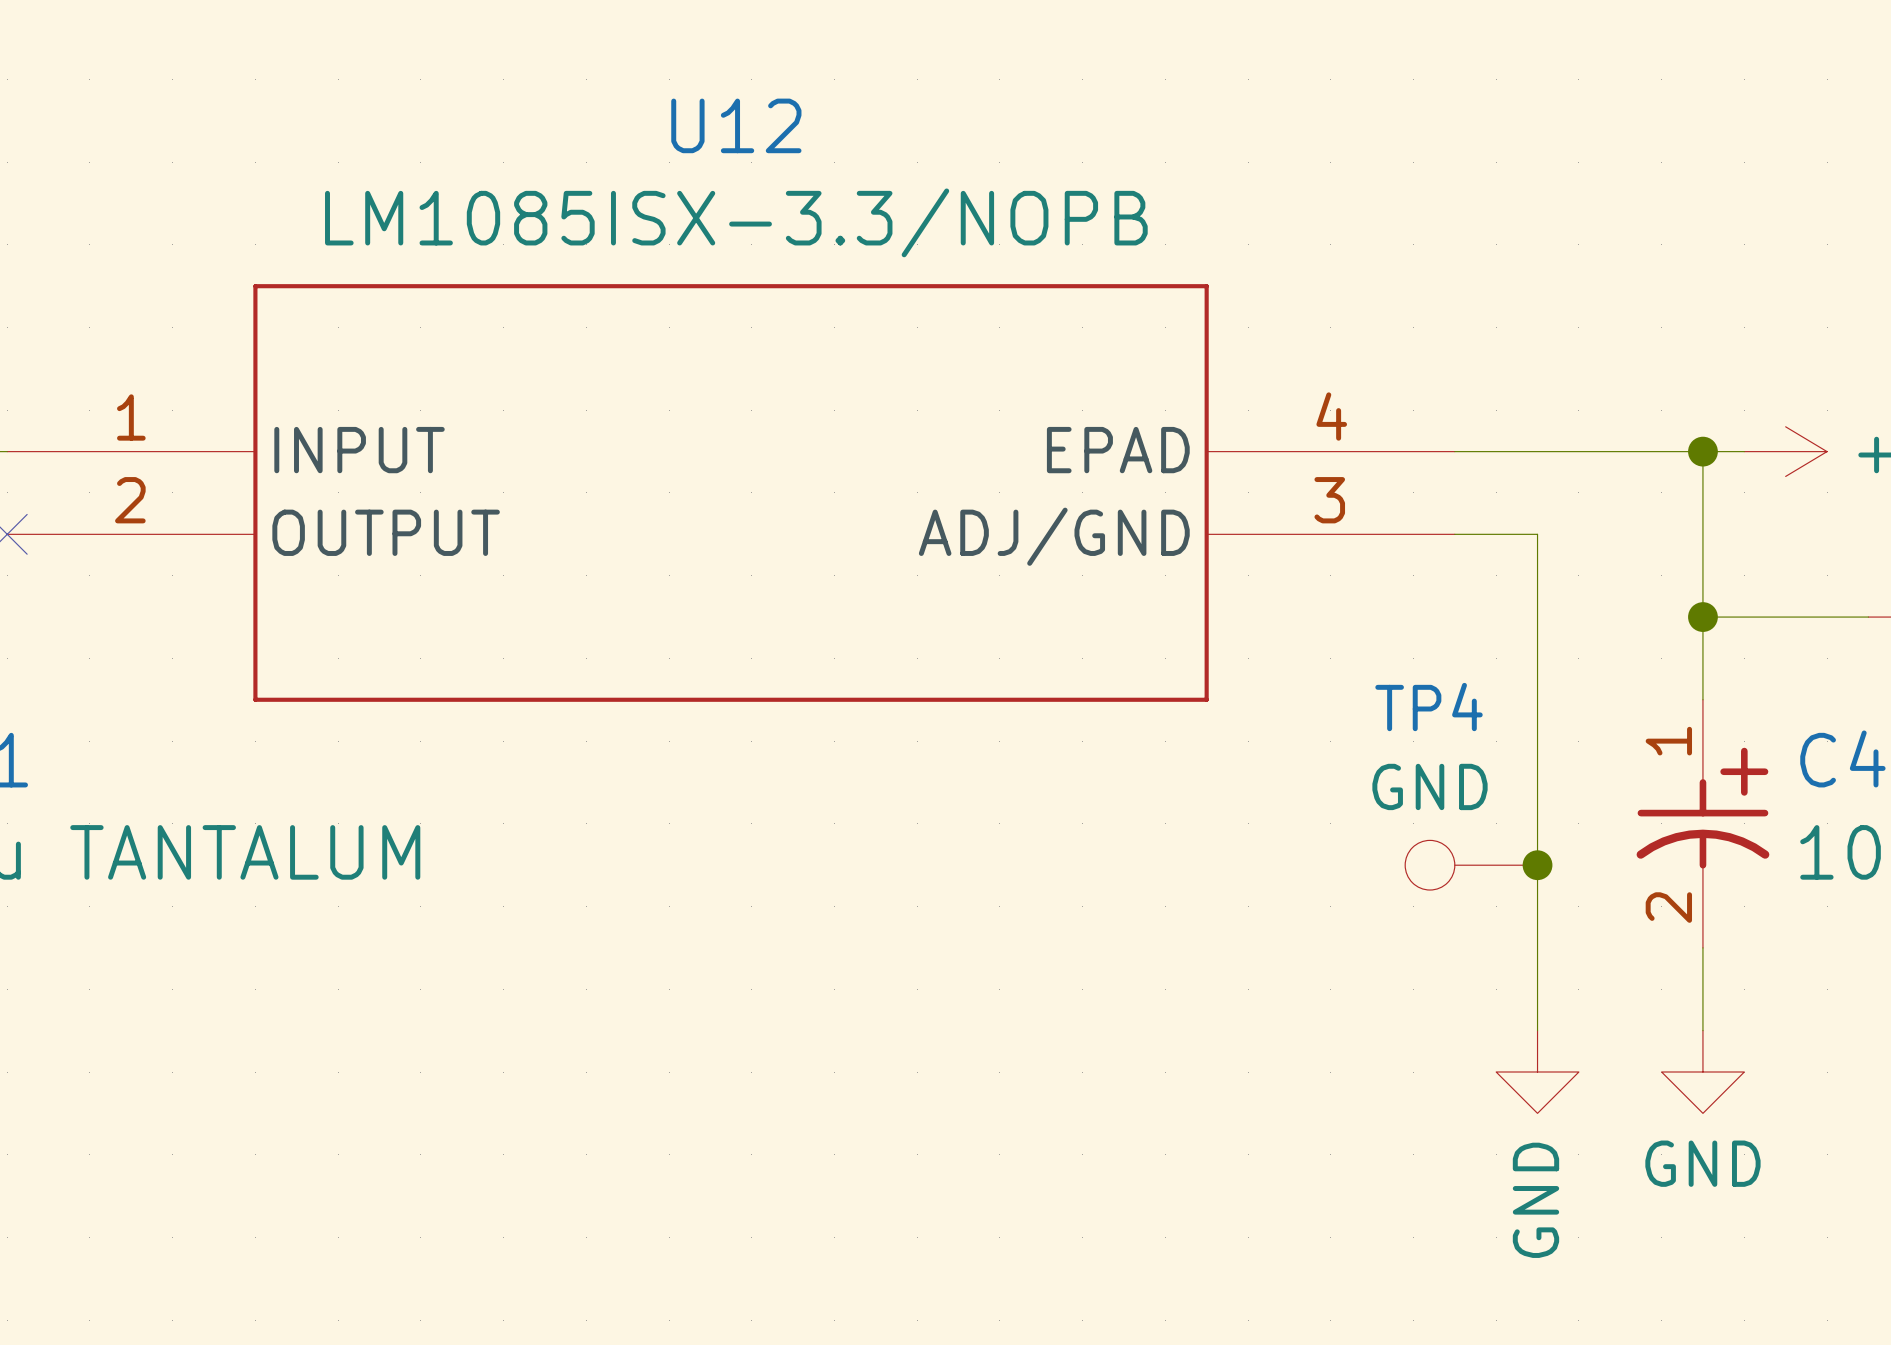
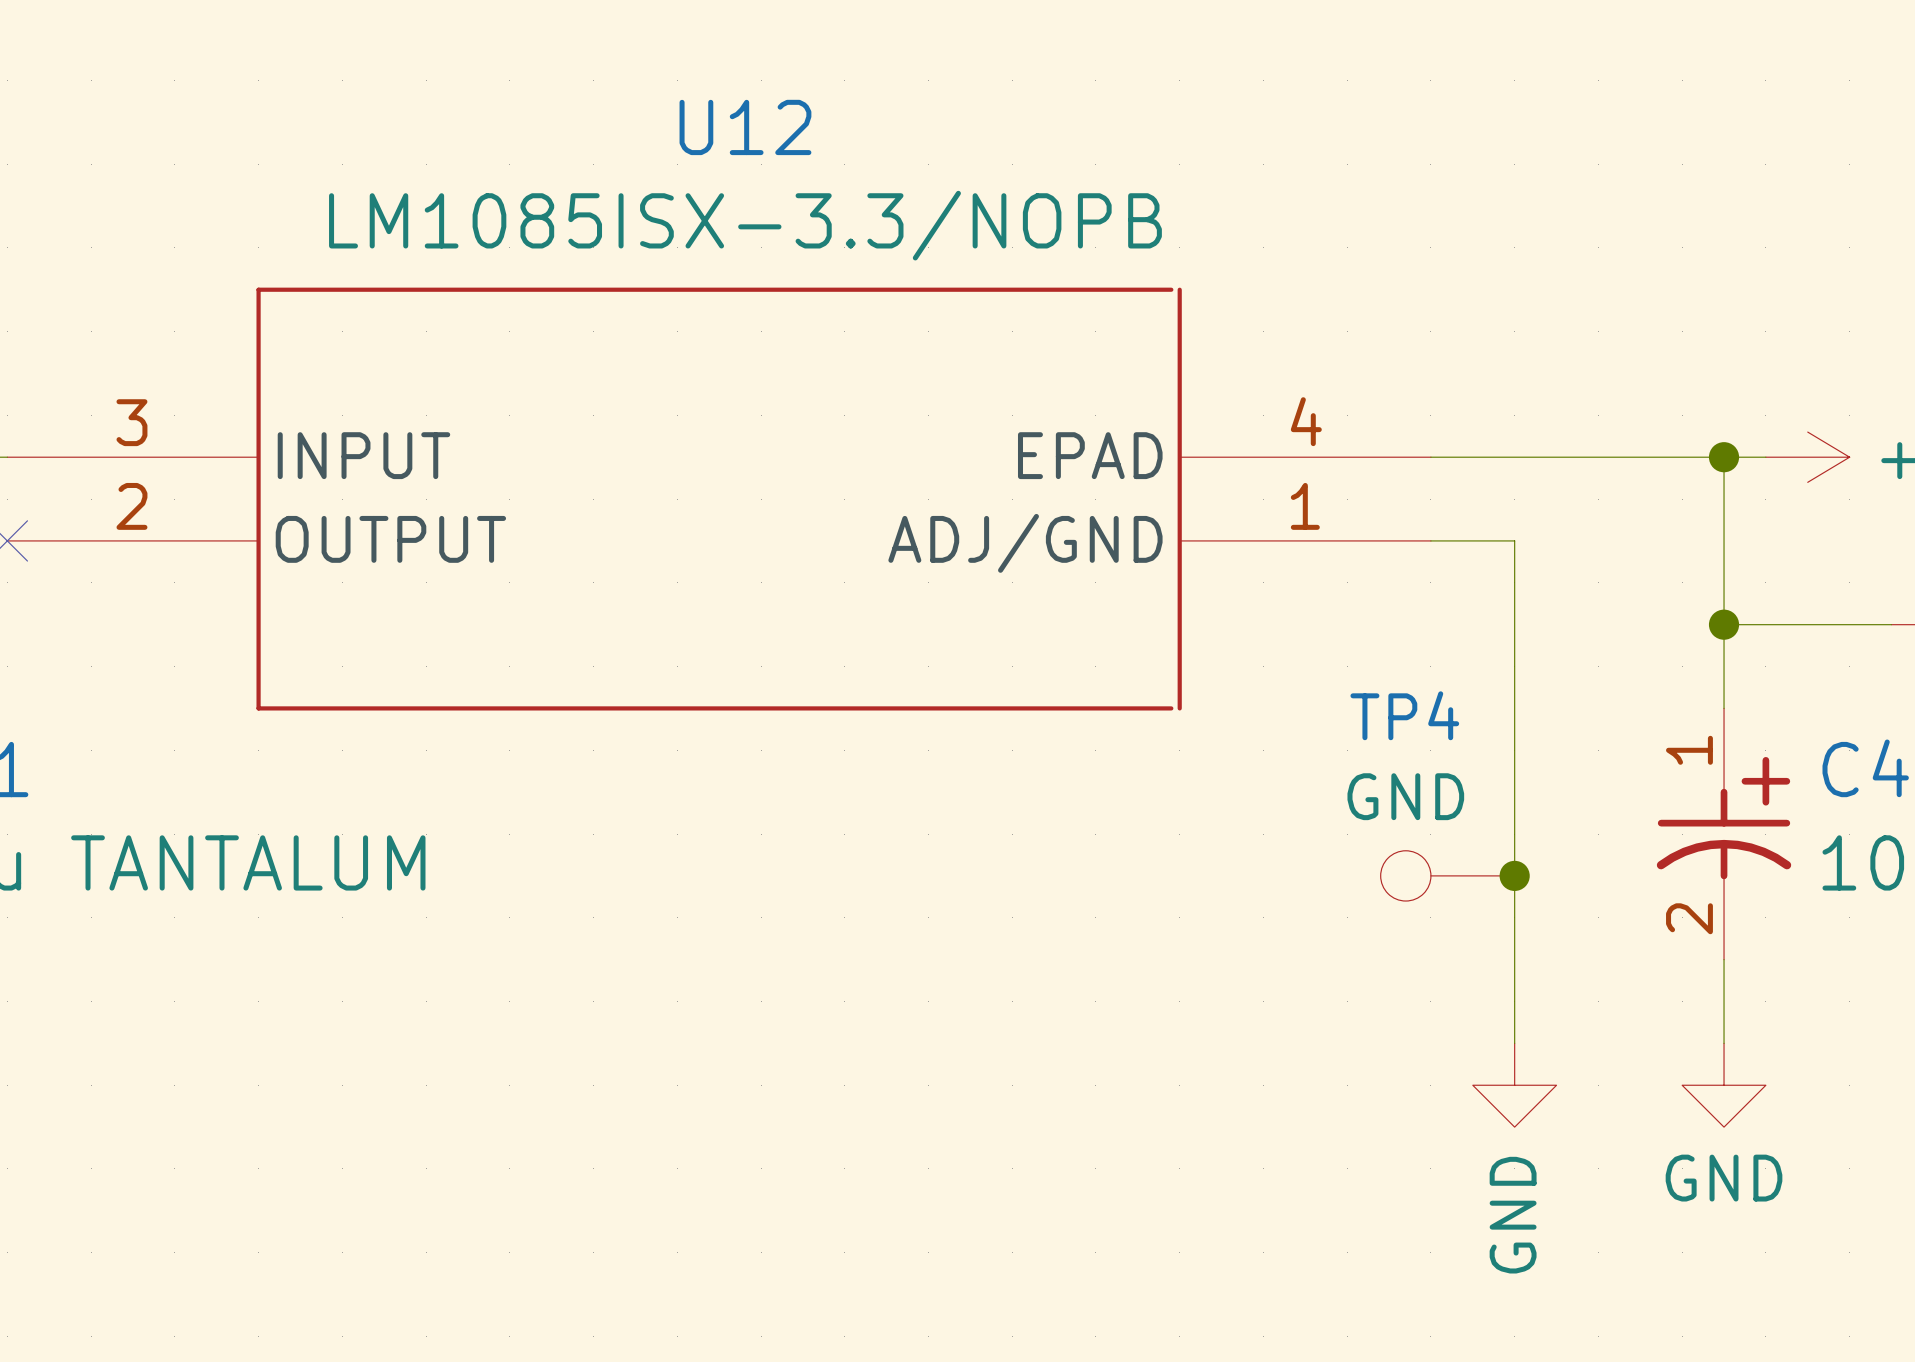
U12 symbol: [7, 284, 1455, 702] -> [7, 287, 1431, 711]
wire: (1496, 534) (1537, 534) (1537, 1030) -> (1514, 540) (1514, 1043)
TP4 position: (1471, 865) -> (1447, 875)
junction position: (1537, 865) -> (1514, 875)
power symbol position: GND (1537, 1072) -> GND (1514, 1085)

